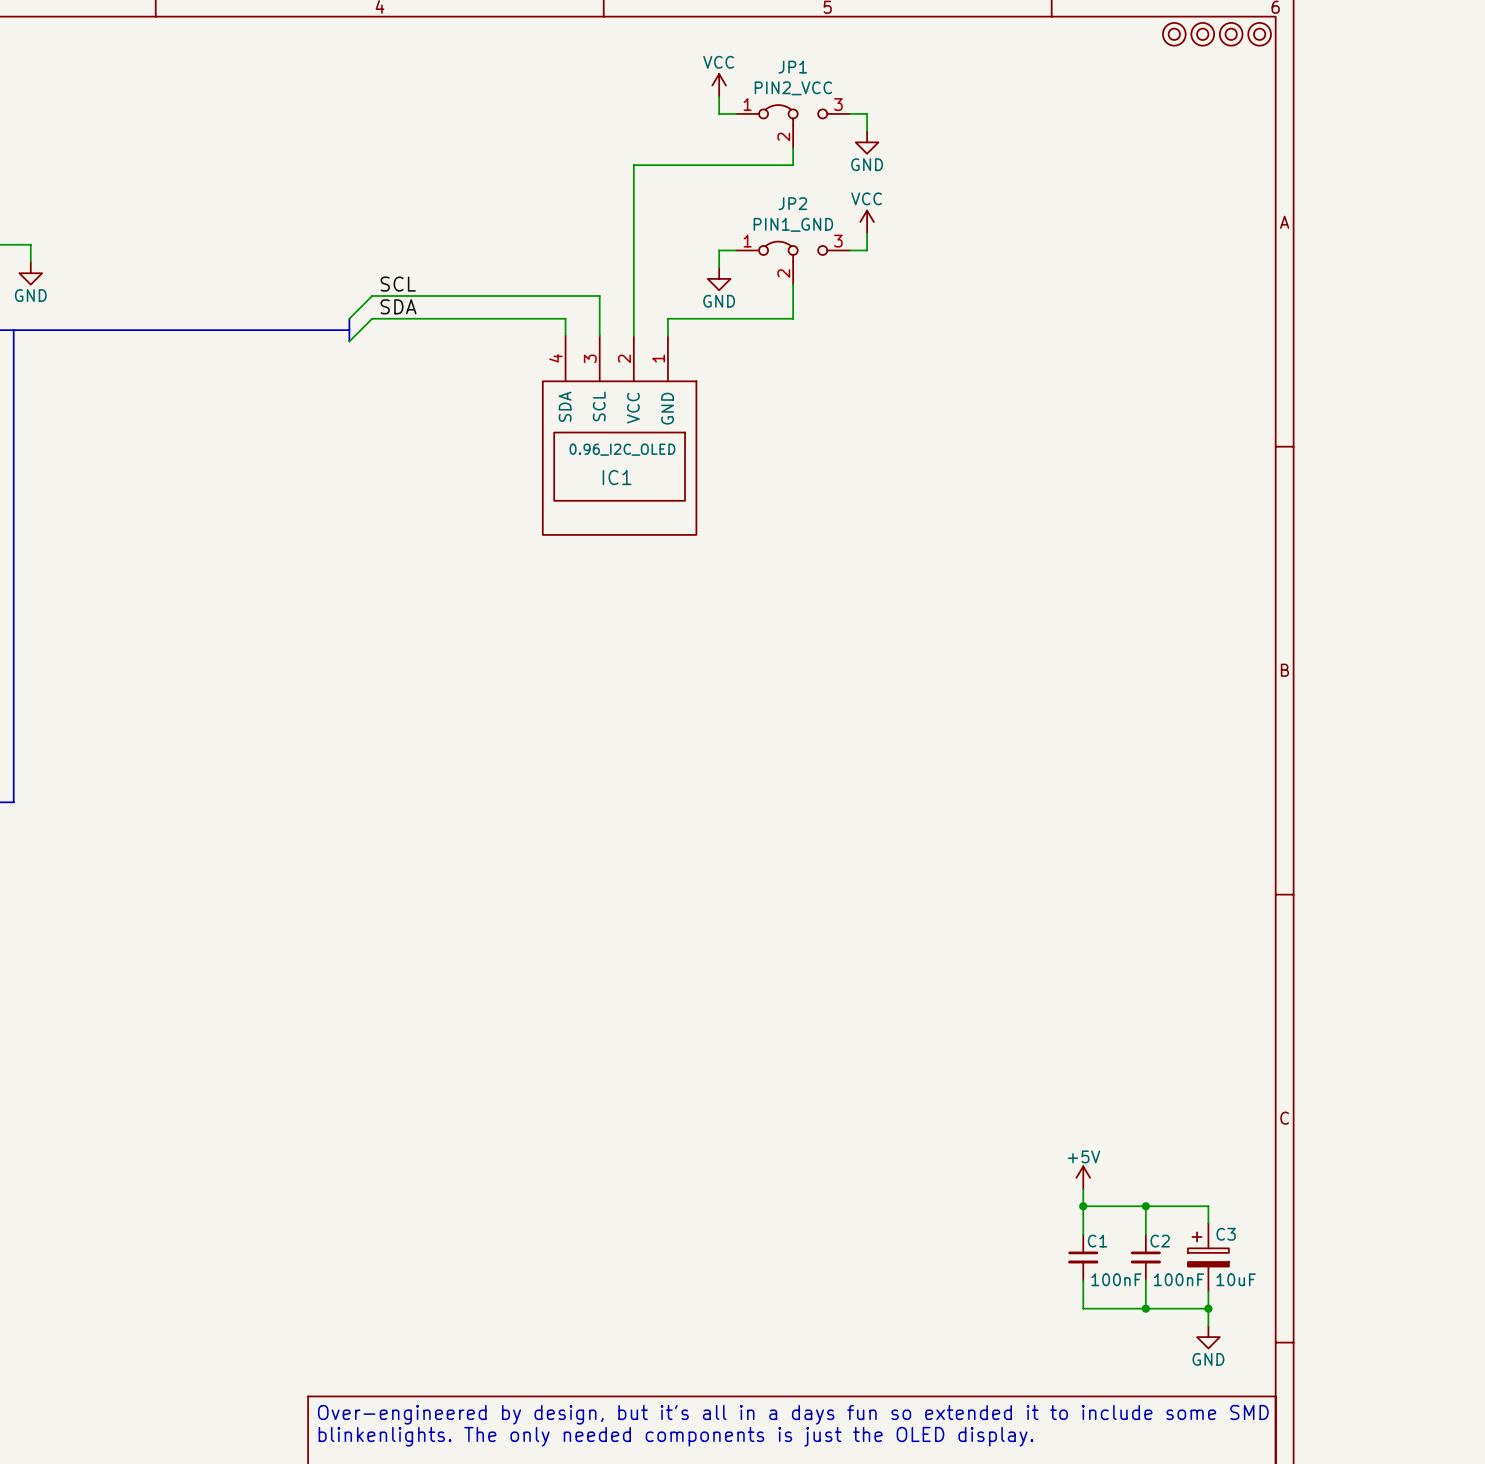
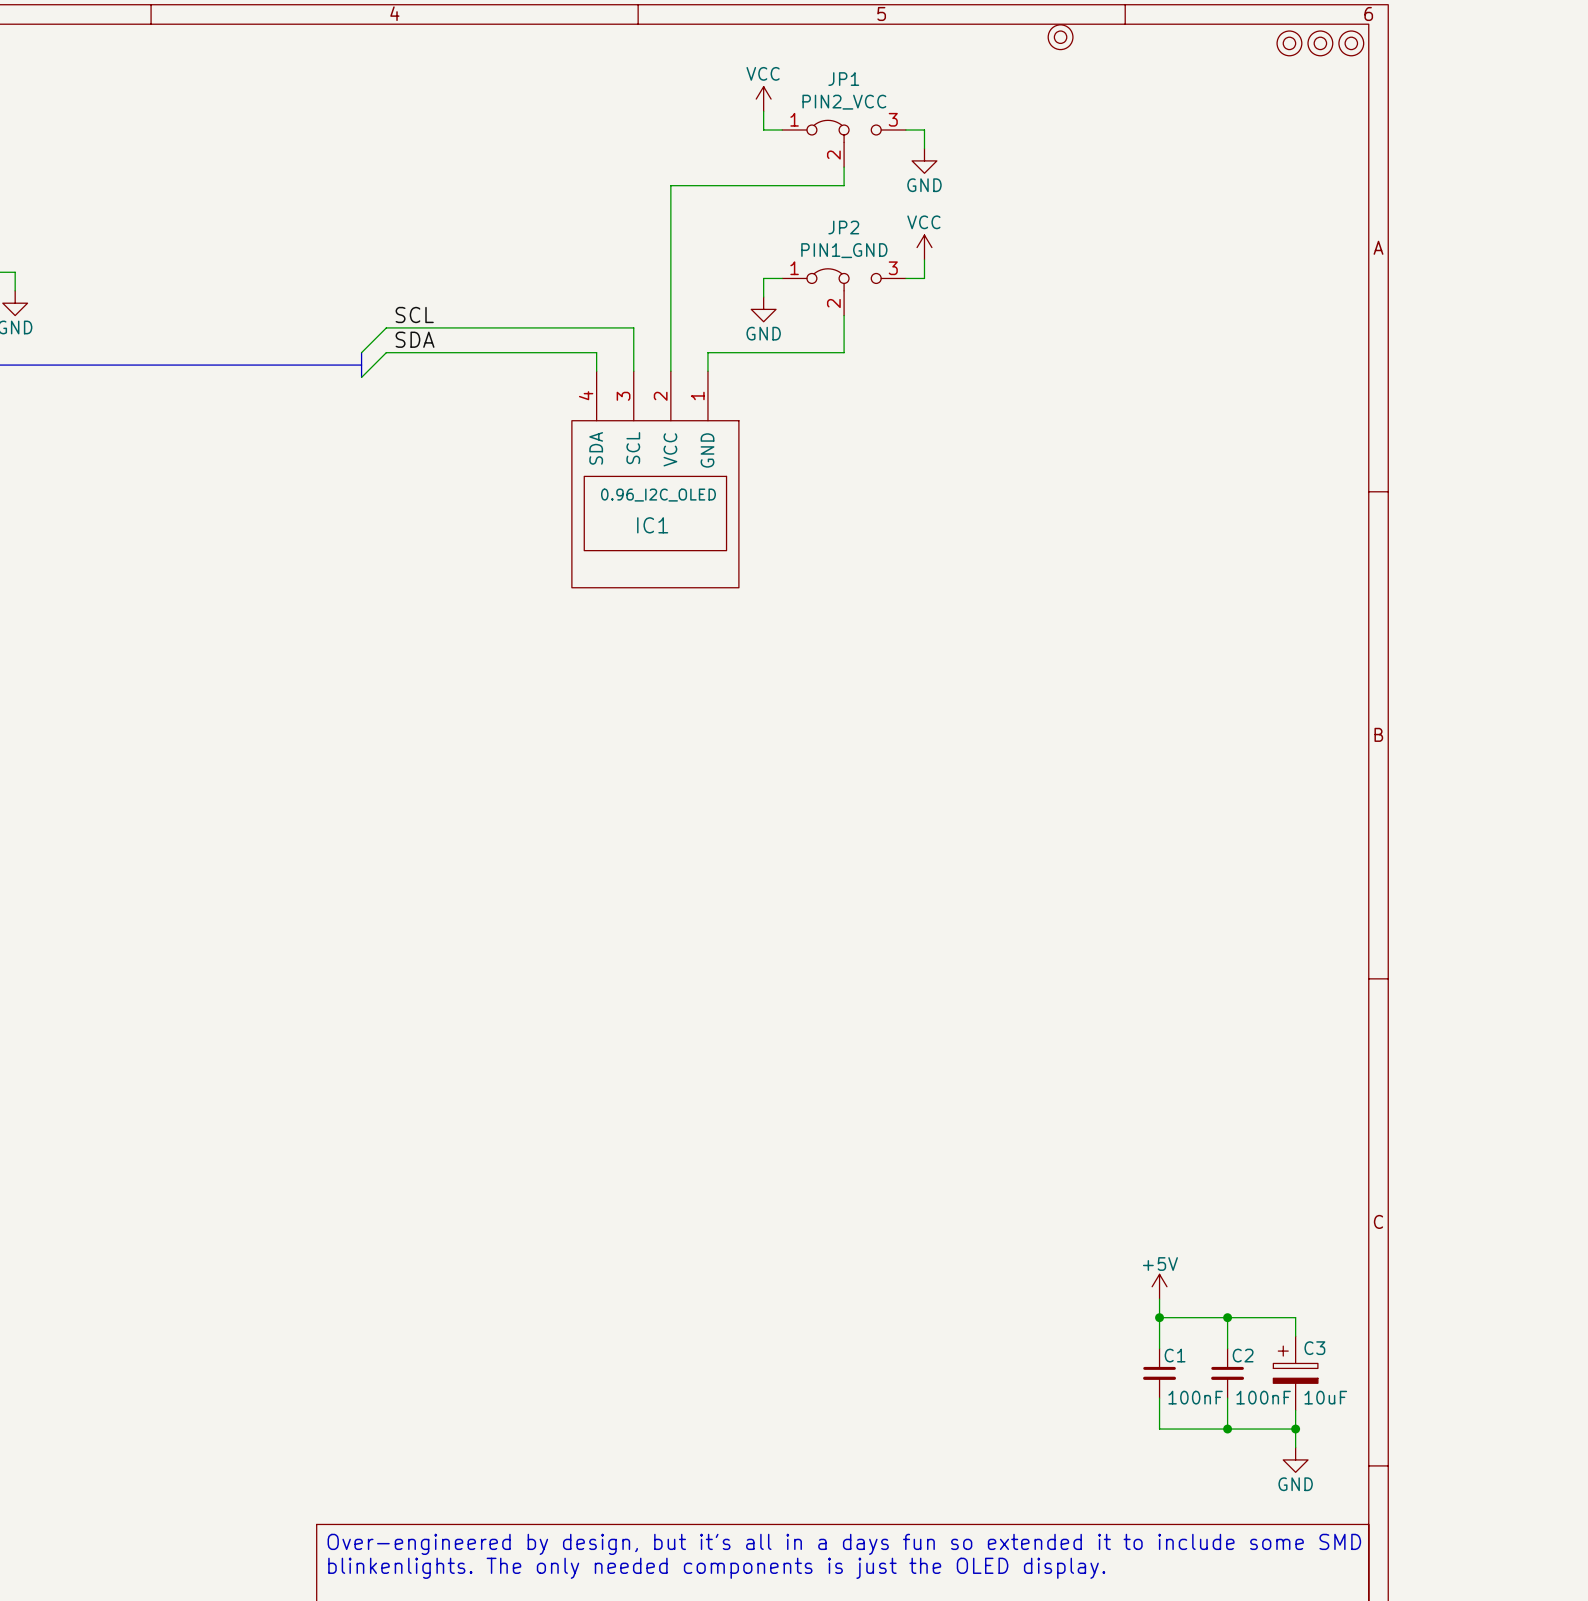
part position: (1174, 34) -> (1060, 37)

